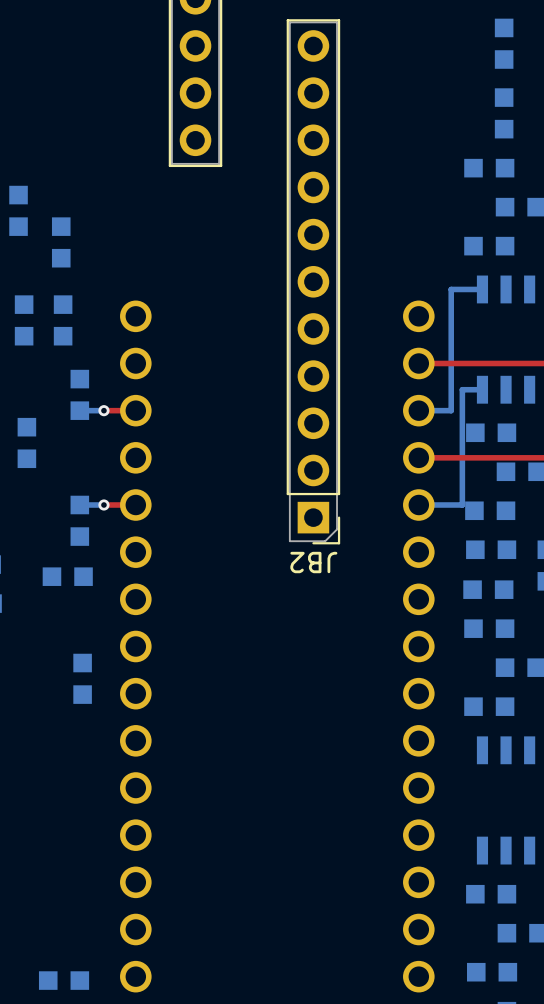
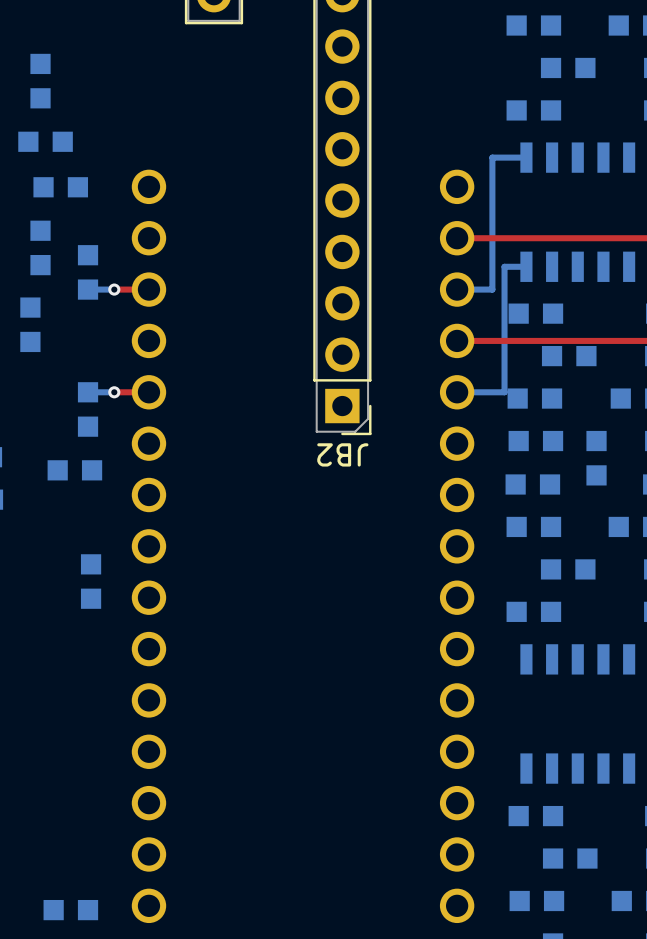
part: (18, 210) -> none
part: none -> (40, 81)
part: (61, 242) -> none
part: none -> (45, 141)
part: (24, 320) -> none
part rotation: 0° (63, 320) -> 90° clockwise (60, 187)
part: none -> (40, 247)

